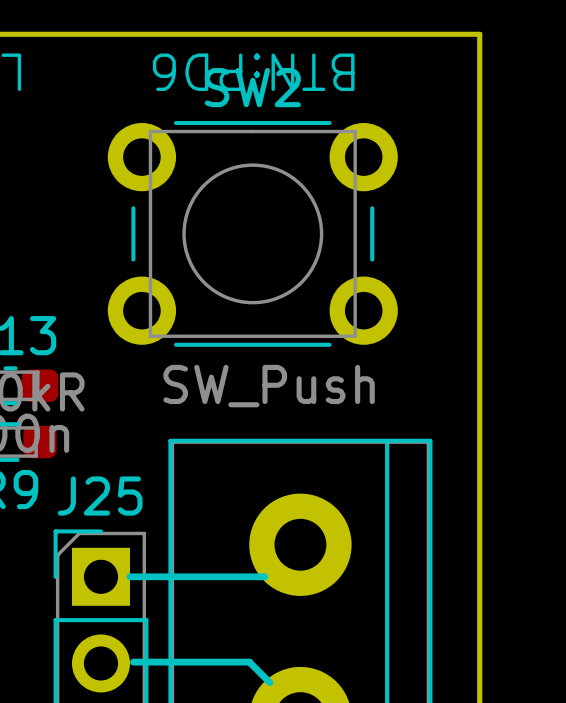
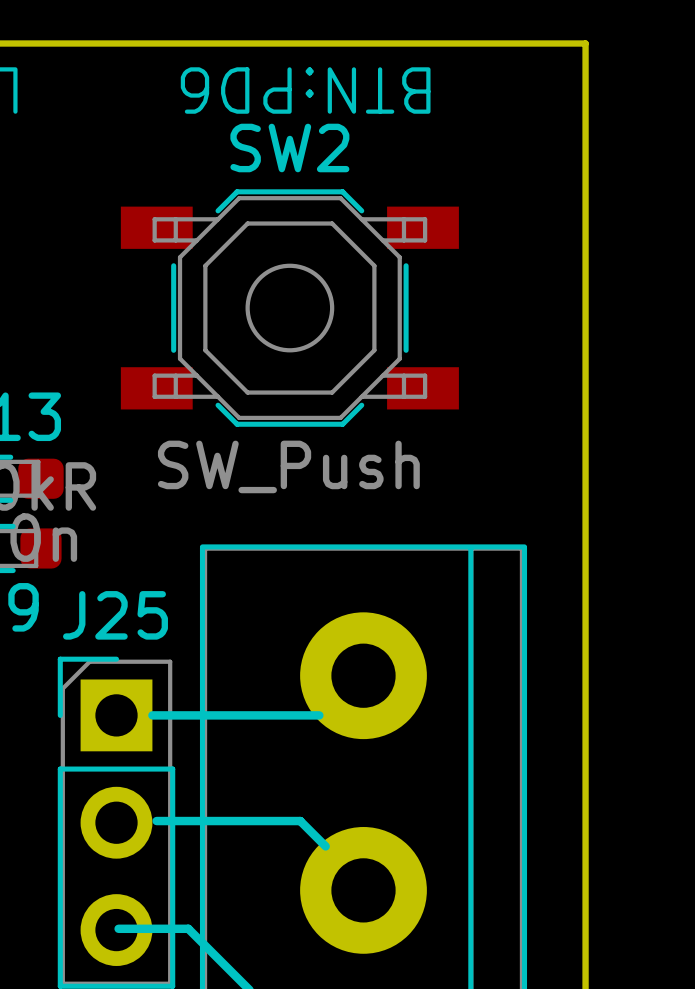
SW2 footprint: [107, 120, 398, 347] -> [120, 189, 459, 427]

